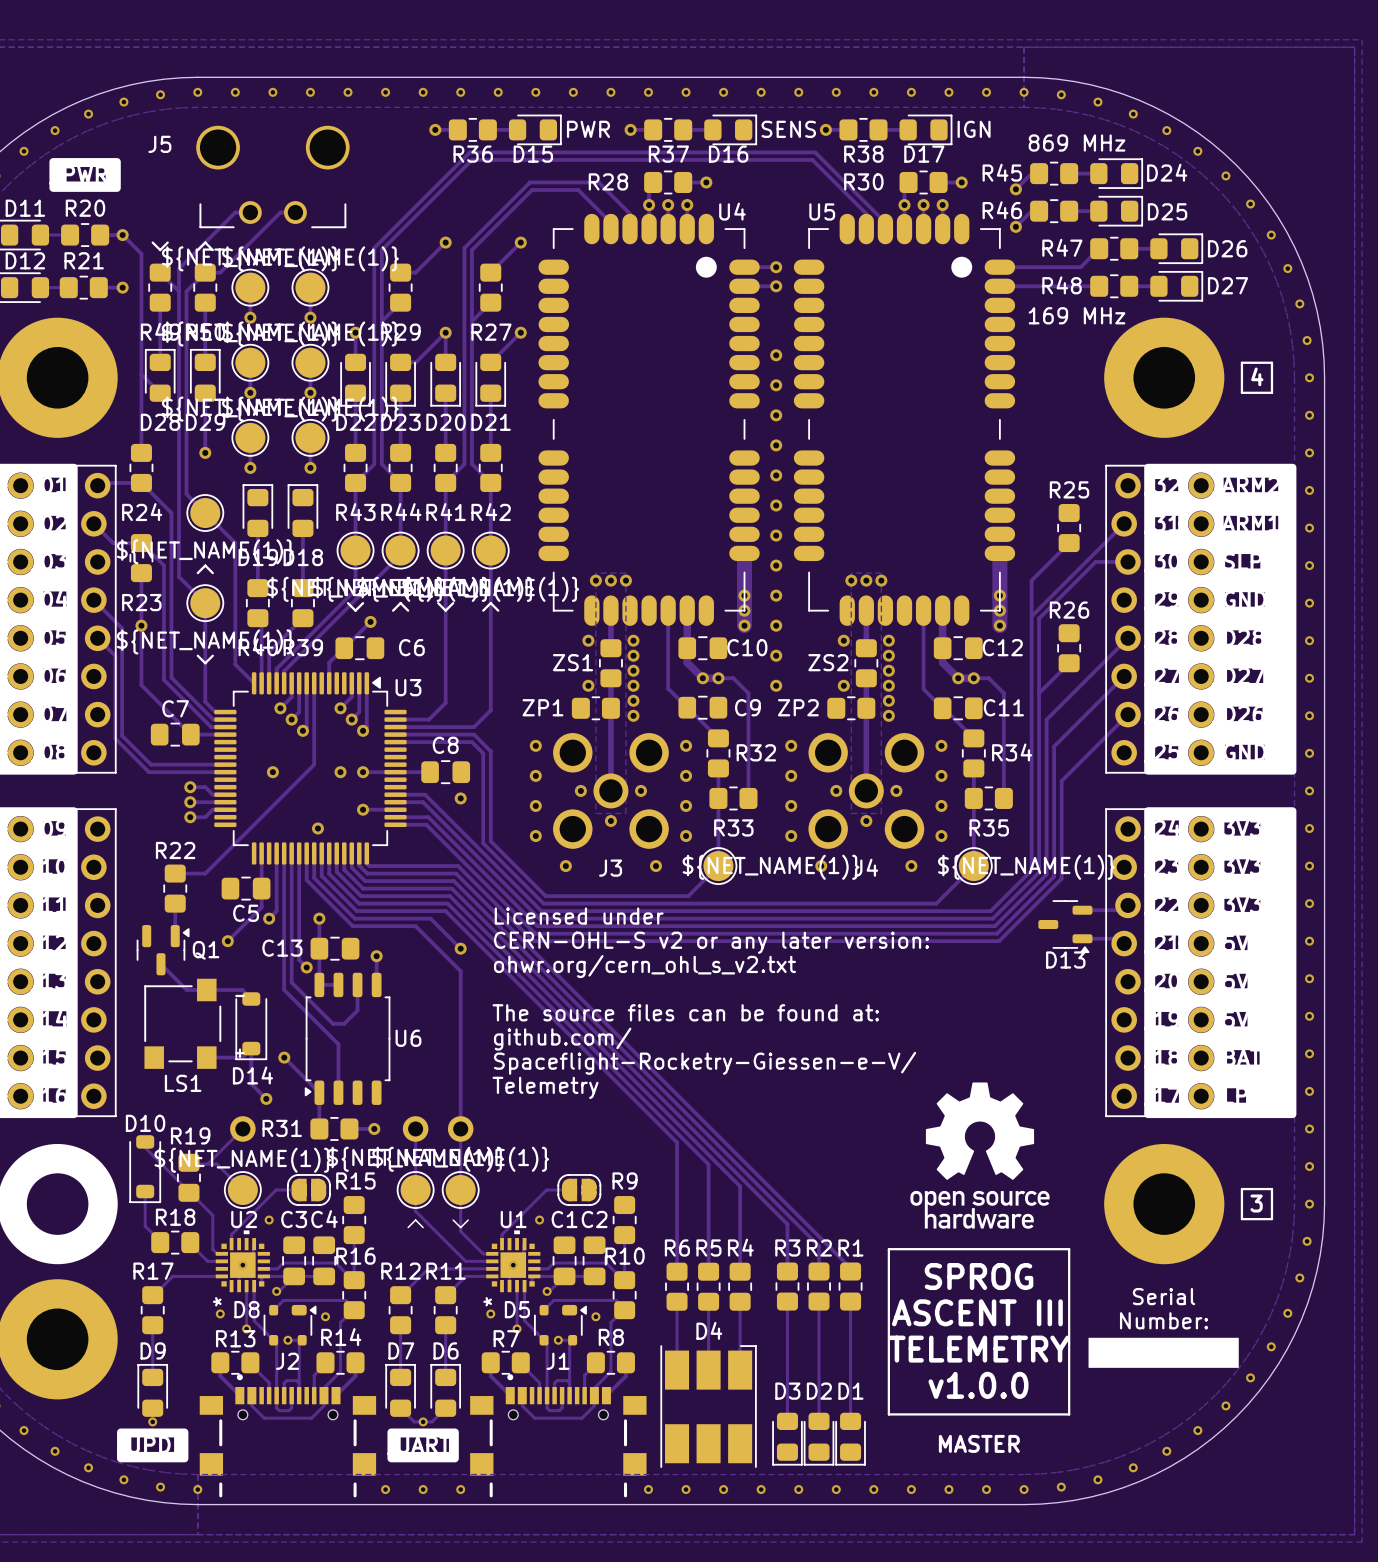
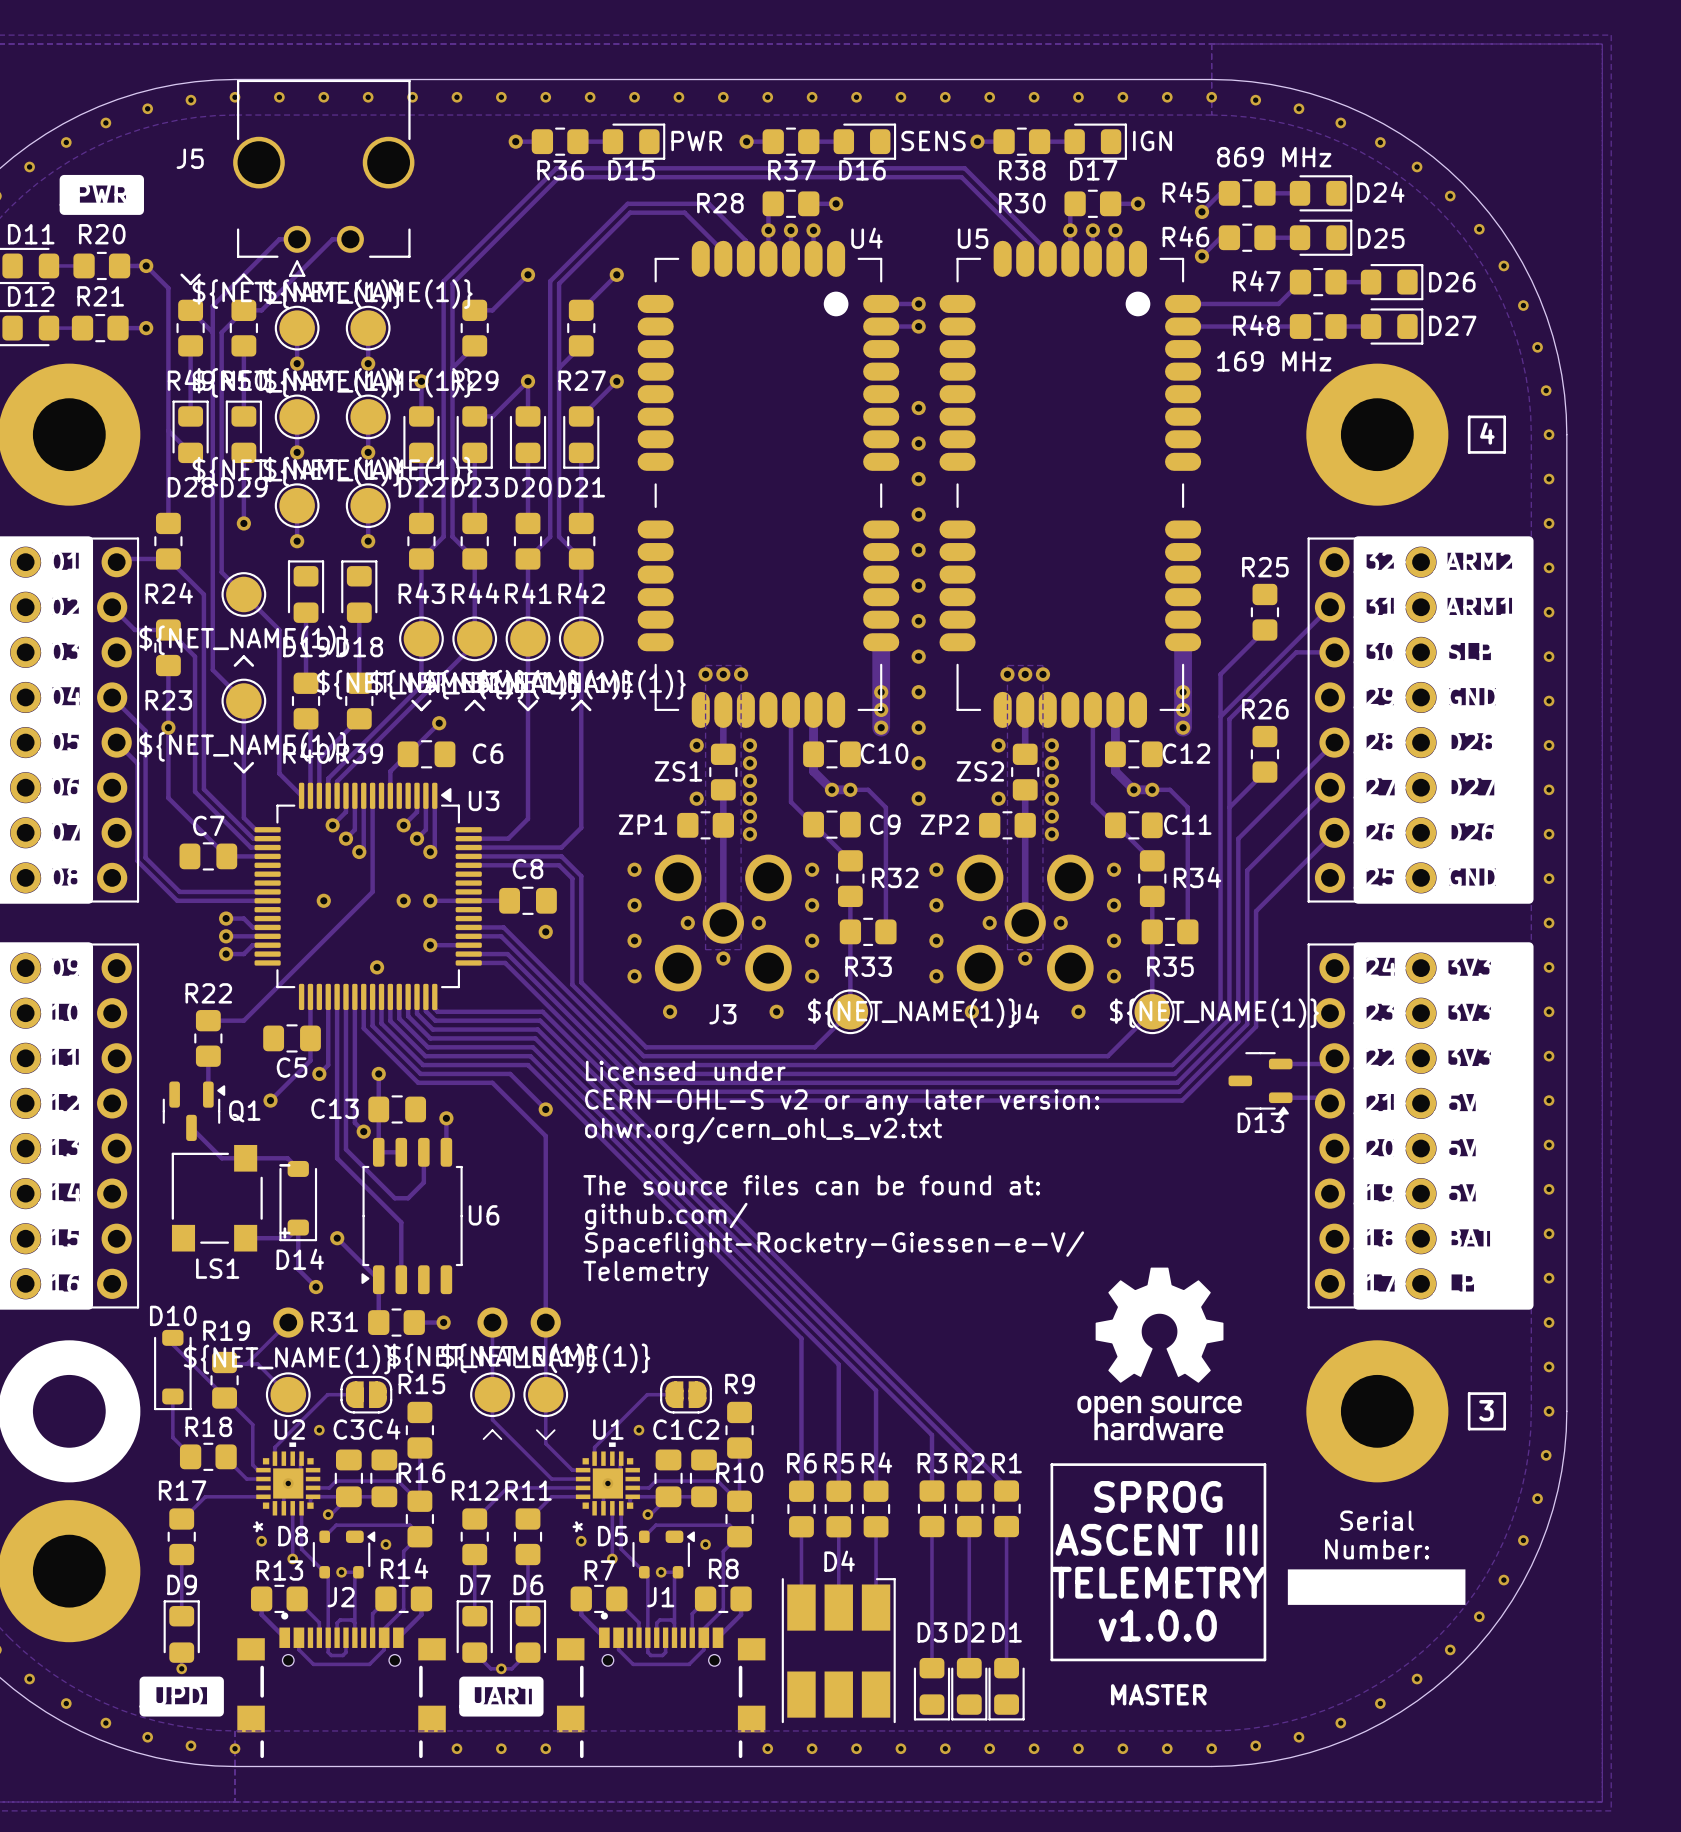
J5 footprint: [196, 125, 350, 229] -> [233, 79, 415, 277]

